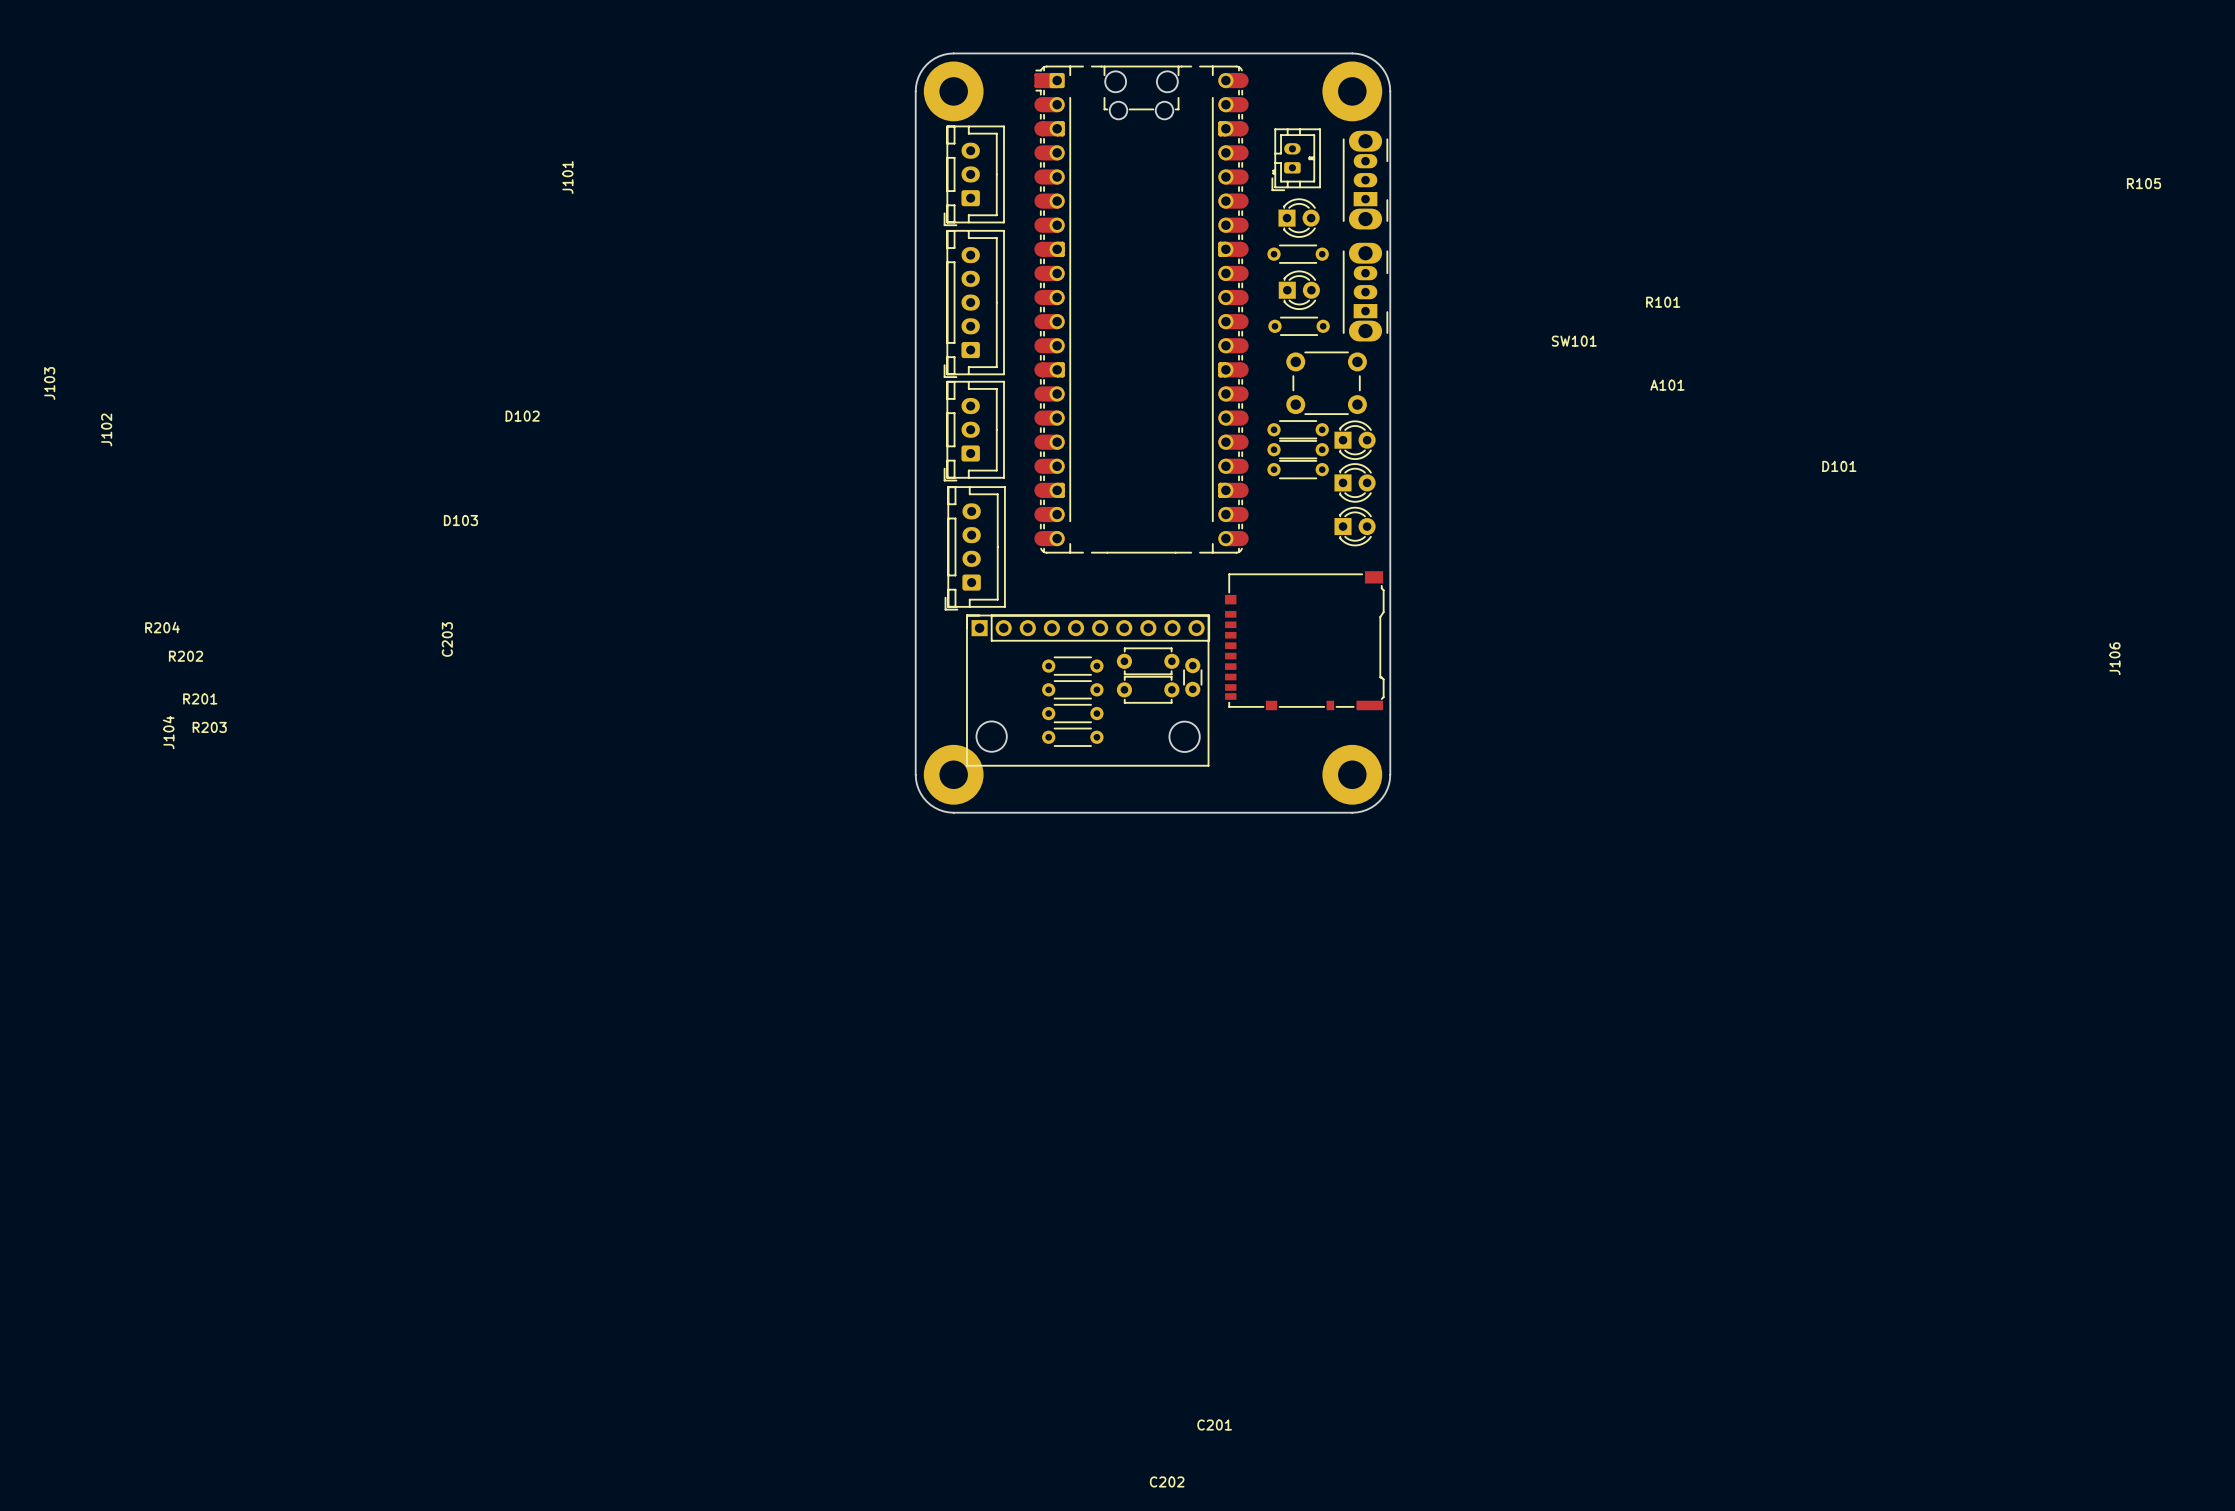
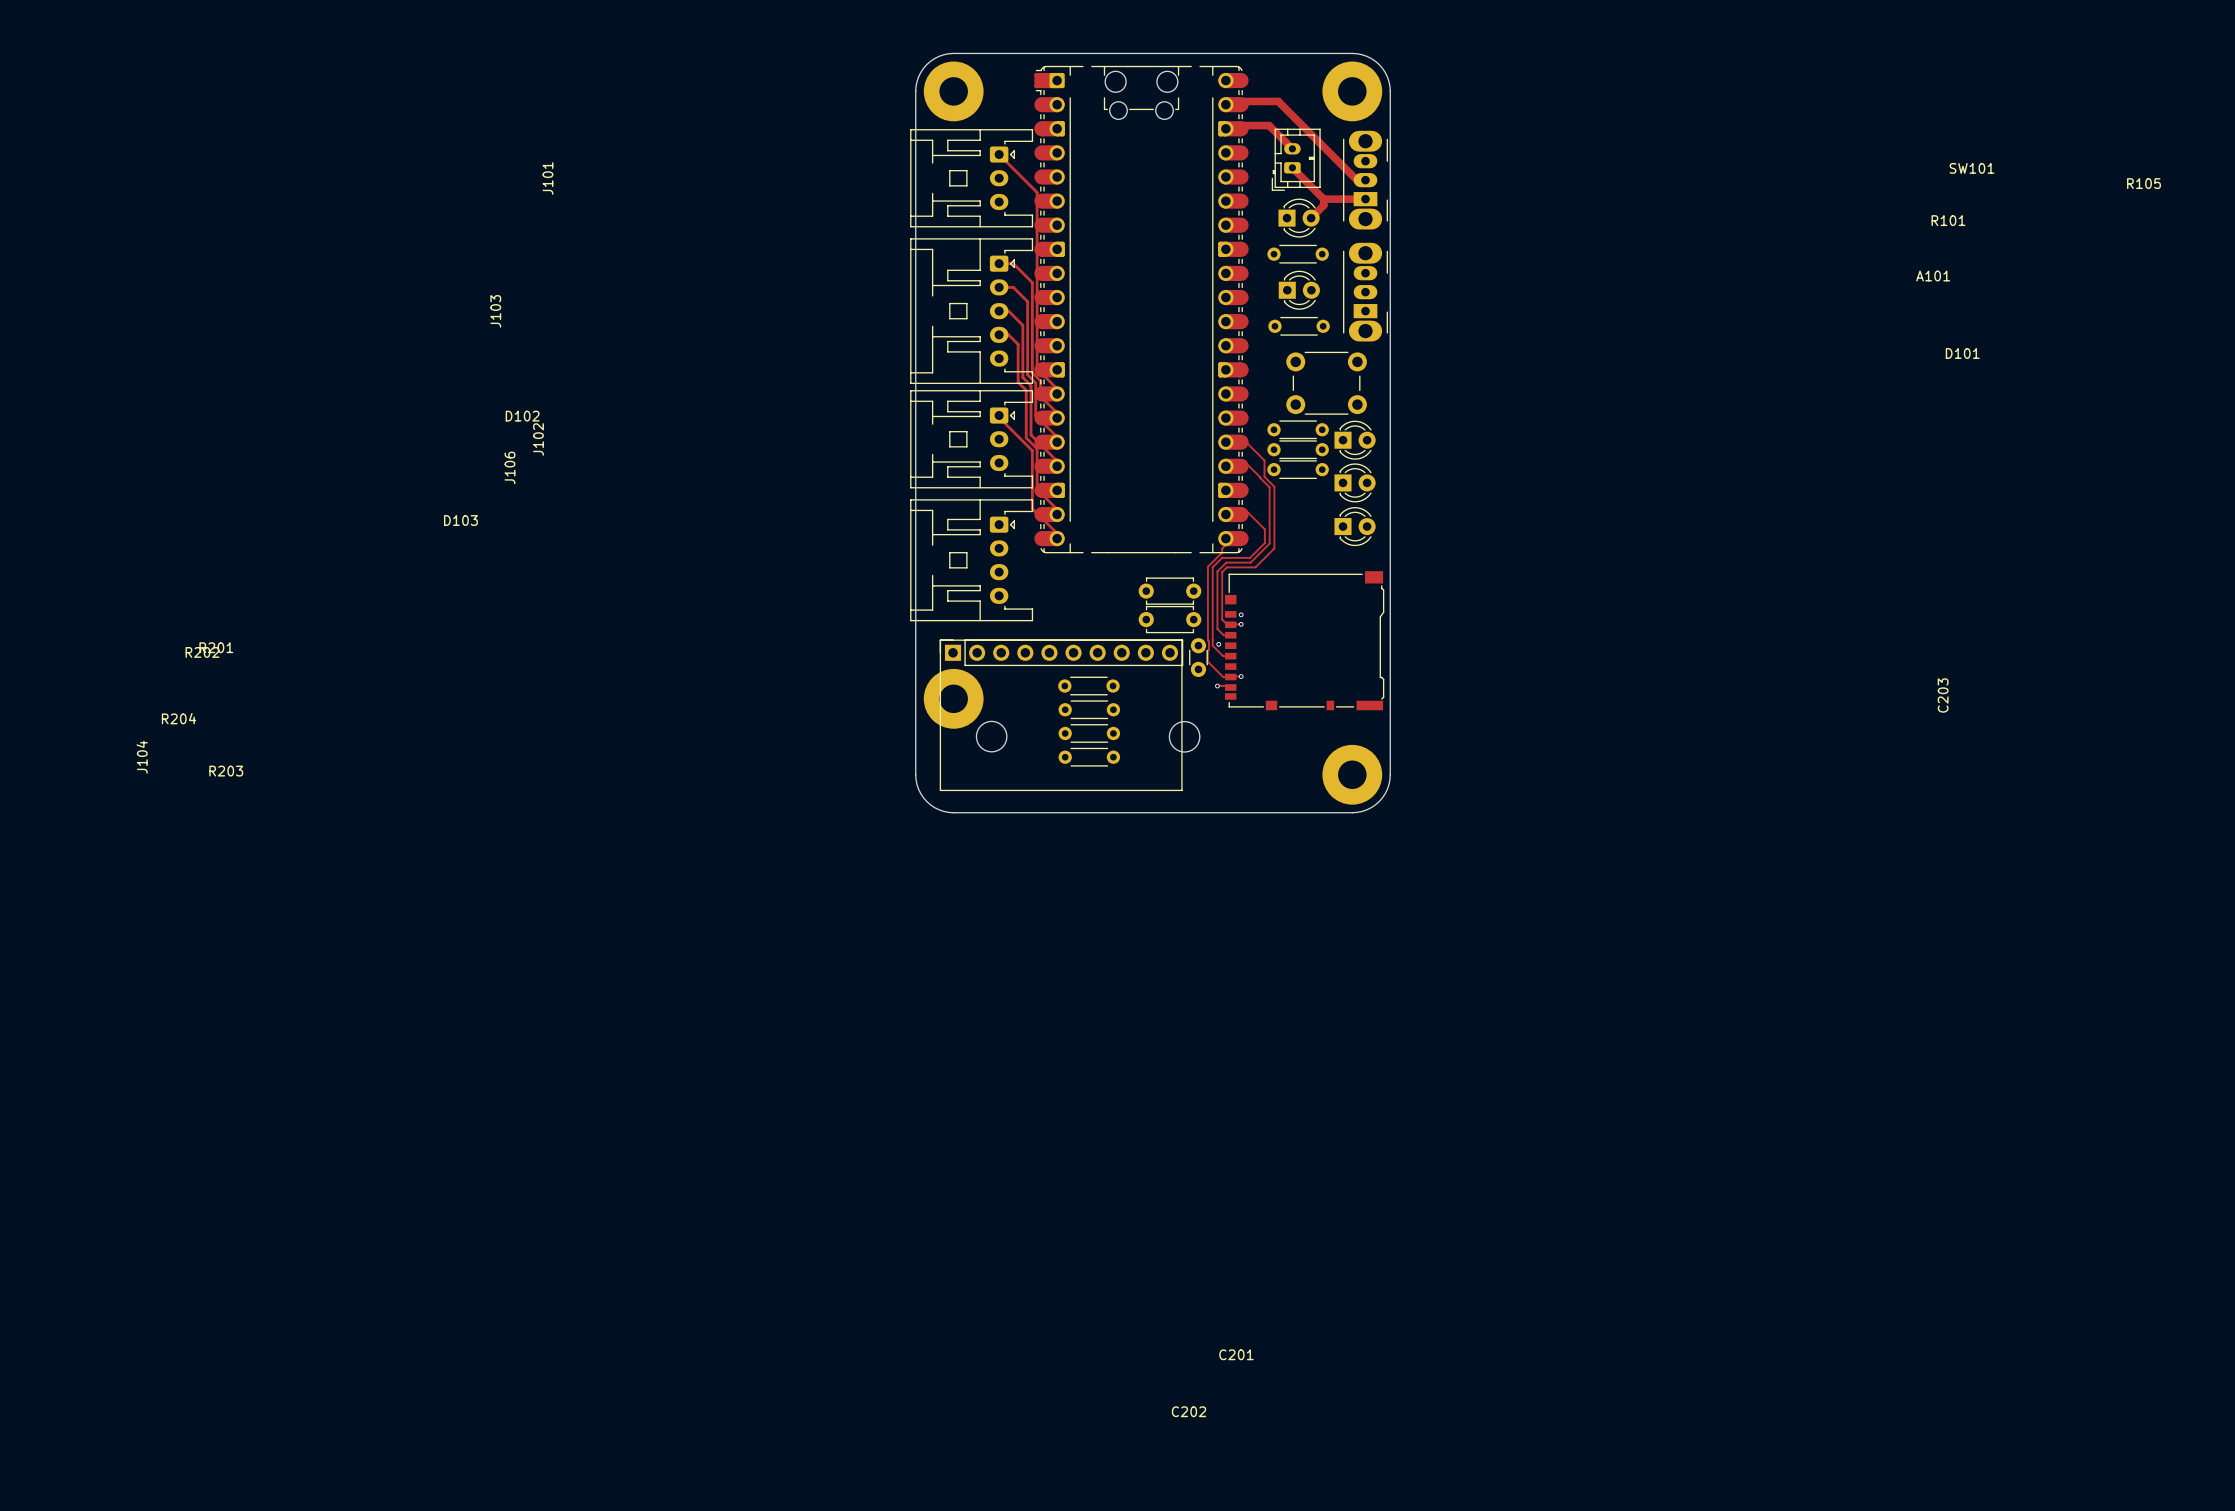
part footprint: [915, 53, 1391, 813] -> [915, 53, 1391, 813]
track: none -> (1242, 101) (1278, 101) (1356, 180) (1365, 180)
J101 footprint: [944, 125, 1005, 226] -> [910, 129, 1034, 228]
track: none -> (1242, 125) (1269, 125) (1292, 148)
track: none -> (999, 154) (1037, 192) (1037, 368) (1059, 390)
track: none -> (1292, 167) (1323, 199)
track: none -> (1323, 199) (1323, 205) (1311, 218)
track: none -> (1323, 199) (1365, 199)
J103 footprint: [944, 230, 1005, 378] -> [910, 238, 1034, 384]
track: none -> (999, 263) (1013, 263) (1032, 282) (1032, 372) (1040, 380) (1040, 396) (1059, 414)
track: none -> (999, 287) (1013, 287) (1027, 301) (1027, 374) (1035, 382) (1035, 415) (1059, 438)
R101 name position: R101 (1663, 302) -> R101 (1948, 220)
track: none -> (999, 311) (1008, 311) (1022, 325) (1022, 377) (1031, 385) (1031, 435) (1059, 463)
track: none -> (999, 334) (1008, 334) (1018, 344) (1018, 382) (1026, 390) (1026, 437) (1037, 448) (1037, 489) (1059, 511)
SW101 name position: SW101 (1574, 341) -> SW101 (1971, 168)
J102 footprint: [944, 381, 1005, 482] -> [910, 390, 1034, 489]
J103 name position: J103 (49, 383) -> J103 (495, 311)
A101 name position: A101 (1667, 385) -> A101 (1933, 276)
track: none -> (999, 415) (1032, 450) (1032, 508) (1059, 535)
J102 name position: J102 (106, 429) -> J102 (538, 439)
track: none -> (1242, 438) (1264, 460) (1264, 476) (1274, 486) (1274, 548) (1255, 567) (1226, 567) (1222, 572) (1222, 619) (1227, 624) (1241, 624)
track: none -> (1235, 463) (1246, 463) (1269, 487) (1269, 543) (1250, 562) (1226, 562) (1217, 571) (1217, 629) (1223, 635) (1230, 635)
D101 name position: D101 (1839, 466) -> D101 (1962, 353)
J106 footprint: [944, 486, 1006, 611] -> [910, 499, 1034, 622]
track: none -> (1235, 511) (1246, 511) (1264, 529) (1264, 543) (1250, 557) (1222, 557) (1212, 567) (1212, 645) (1223, 656) (1230, 656)
track: none -> (1235, 535) (1222, 548) (1222, 553) (1207, 566) (1207, 662) (1223, 677) (1241, 676)
via: none -> (1241, 614)
line: (966, 615) (1208, 615) (1208, 765) (966, 765) (966, 615) -> (940, 640) (1181, 640) (1181, 790) (940, 790) (940, 640)
via: none -> (1241, 624)
J104 position: (1088, 628) -> (1061, 652)
C203 name position: C203 (447, 639) -> C203 (1943, 695)
via: none -> (1218, 644)
J106 name position: J106 (2114, 658) -> J106 (510, 467)
C201 position: (1148, 661) -> (1169, 591)
R204 position: (1072, 666) -> (1089, 757)
via: none -> (1241, 676)
C203 position: (1192, 677) -> (1198, 657)
track: none -> (1217, 686) (1230, 687)
via: none -> (1217, 686)
R203 position: (1072, 689) -> (1089, 733)
C202 position: (1148, 689) -> (1169, 619)
R202 position: (1072, 713) -> (1089, 709)
R201 position: (1072, 737) -> (1088, 686)

